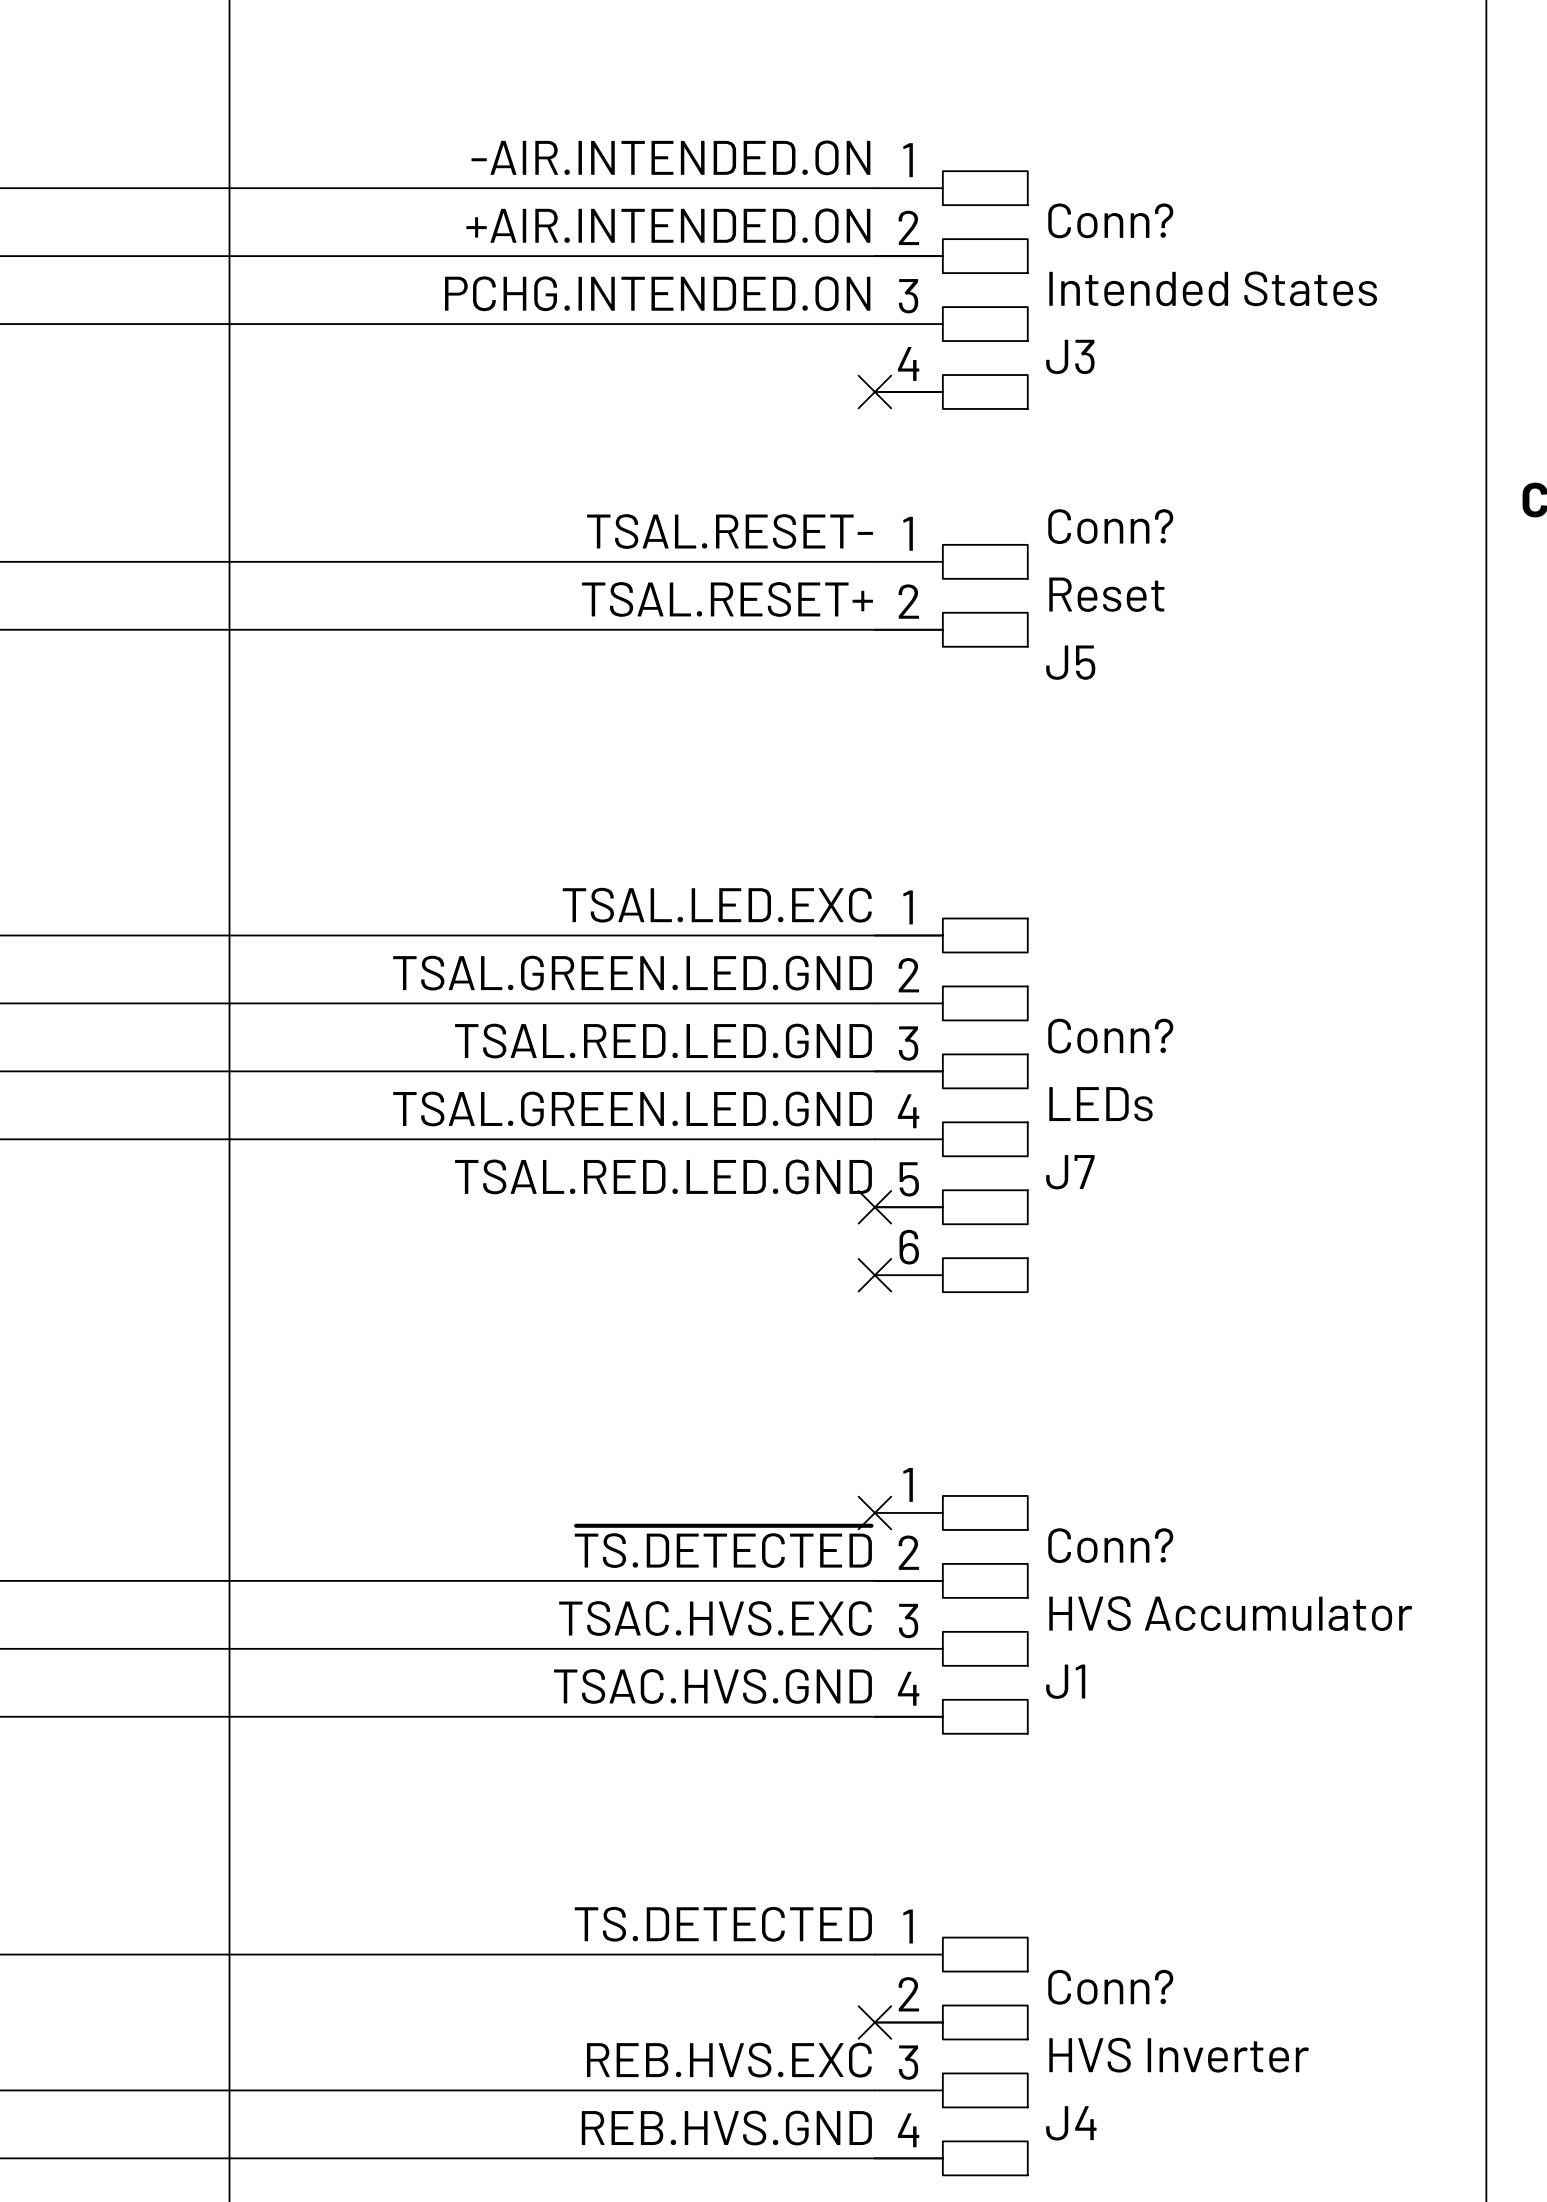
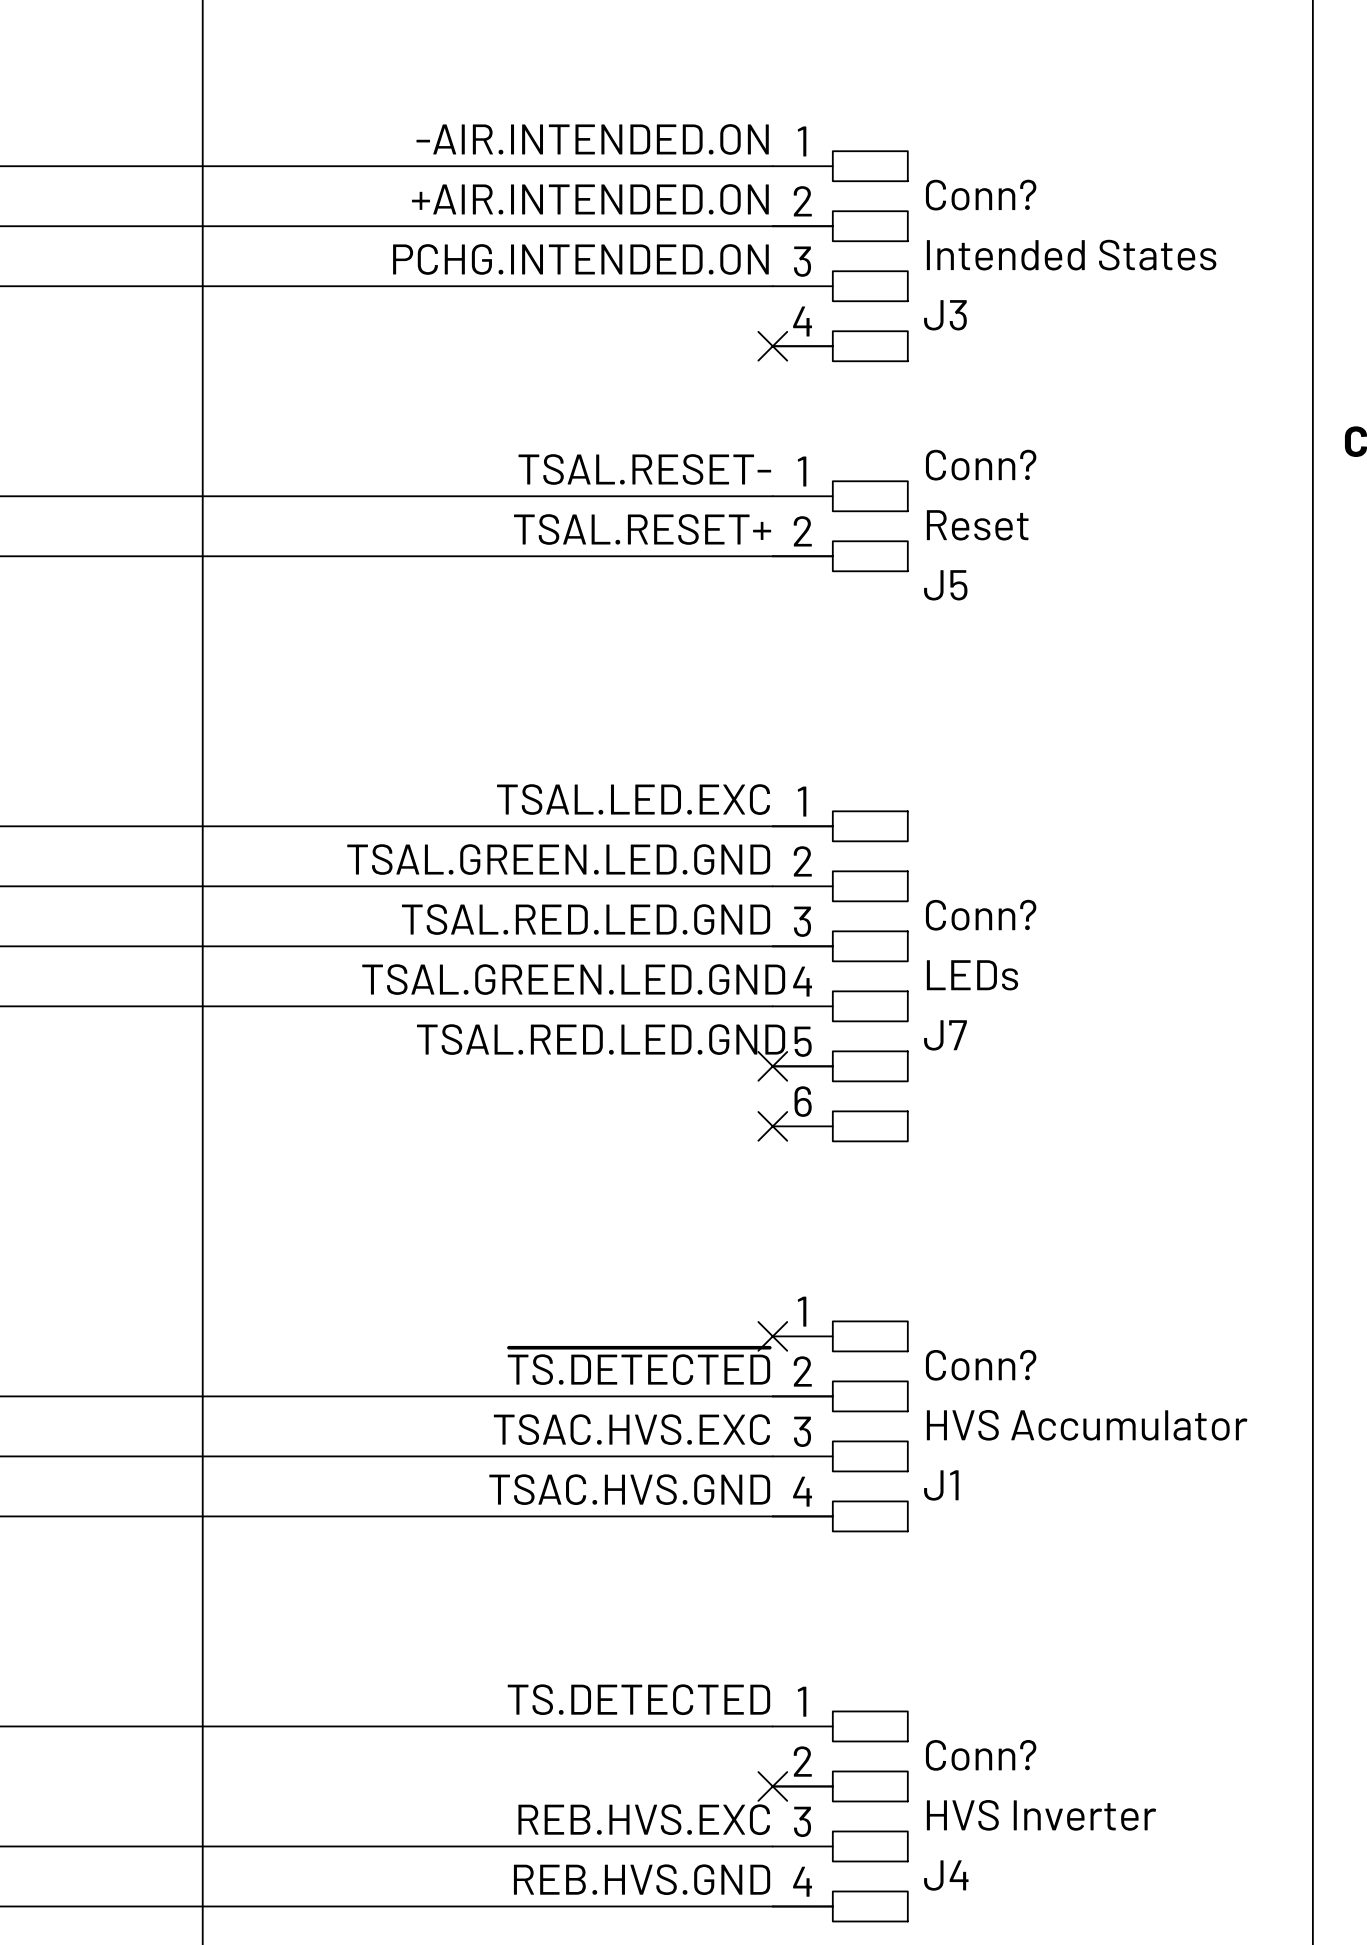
label position: TSAL.GREEN.LED.GND (632, 1108) -> TSAL.GREEN.LED.GND (573, 979)
label position: TSAL.RED.LED.GND (663, 1176) -> TSAL.RED.LED.GND (601, 1039)

